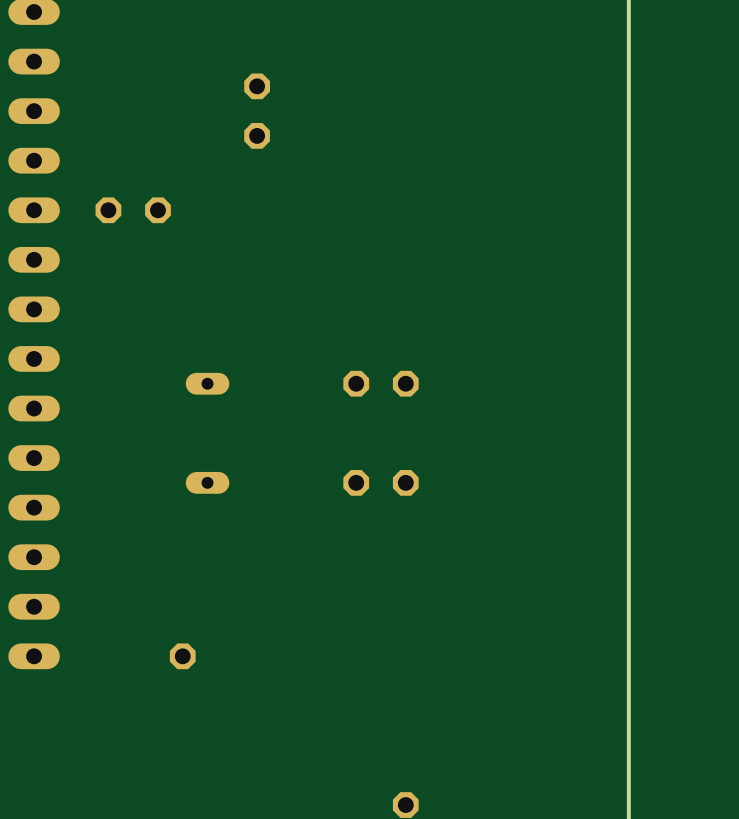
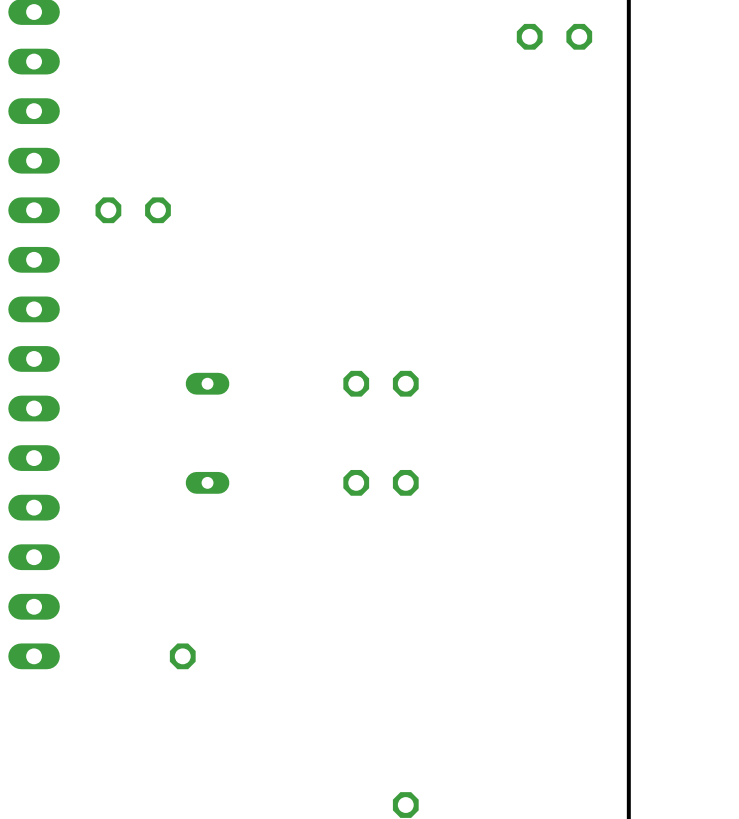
part rotation: 0° (257, 111) -> 90° clockwise (554, 36)
part position: (257, 111) -> (554, 36)

